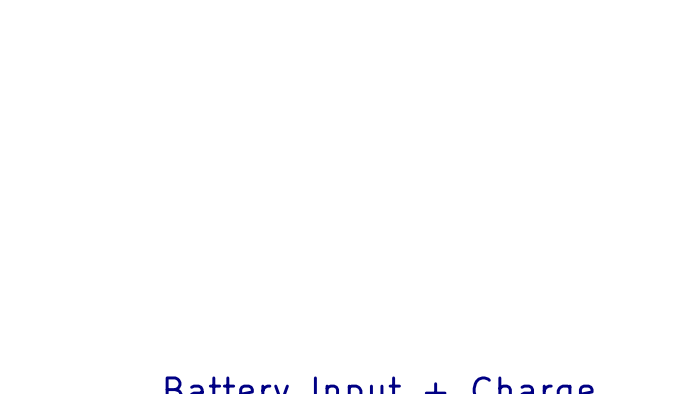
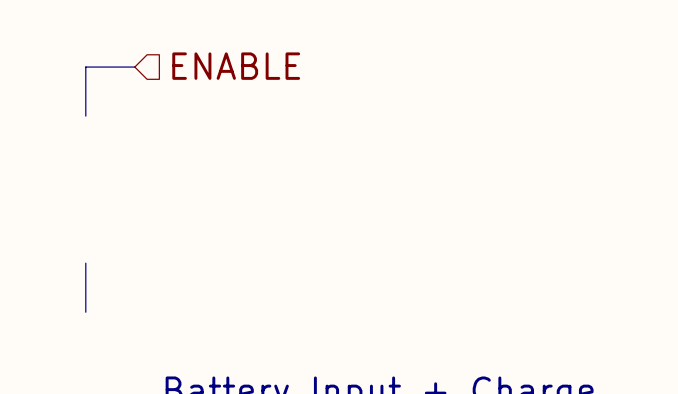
hierarchical label: none -> ENABLE (236, 66)
wire: none -> (134, 67) (85, 67) (85, 116)
wire: none -> (85, 263) (85, 312)

